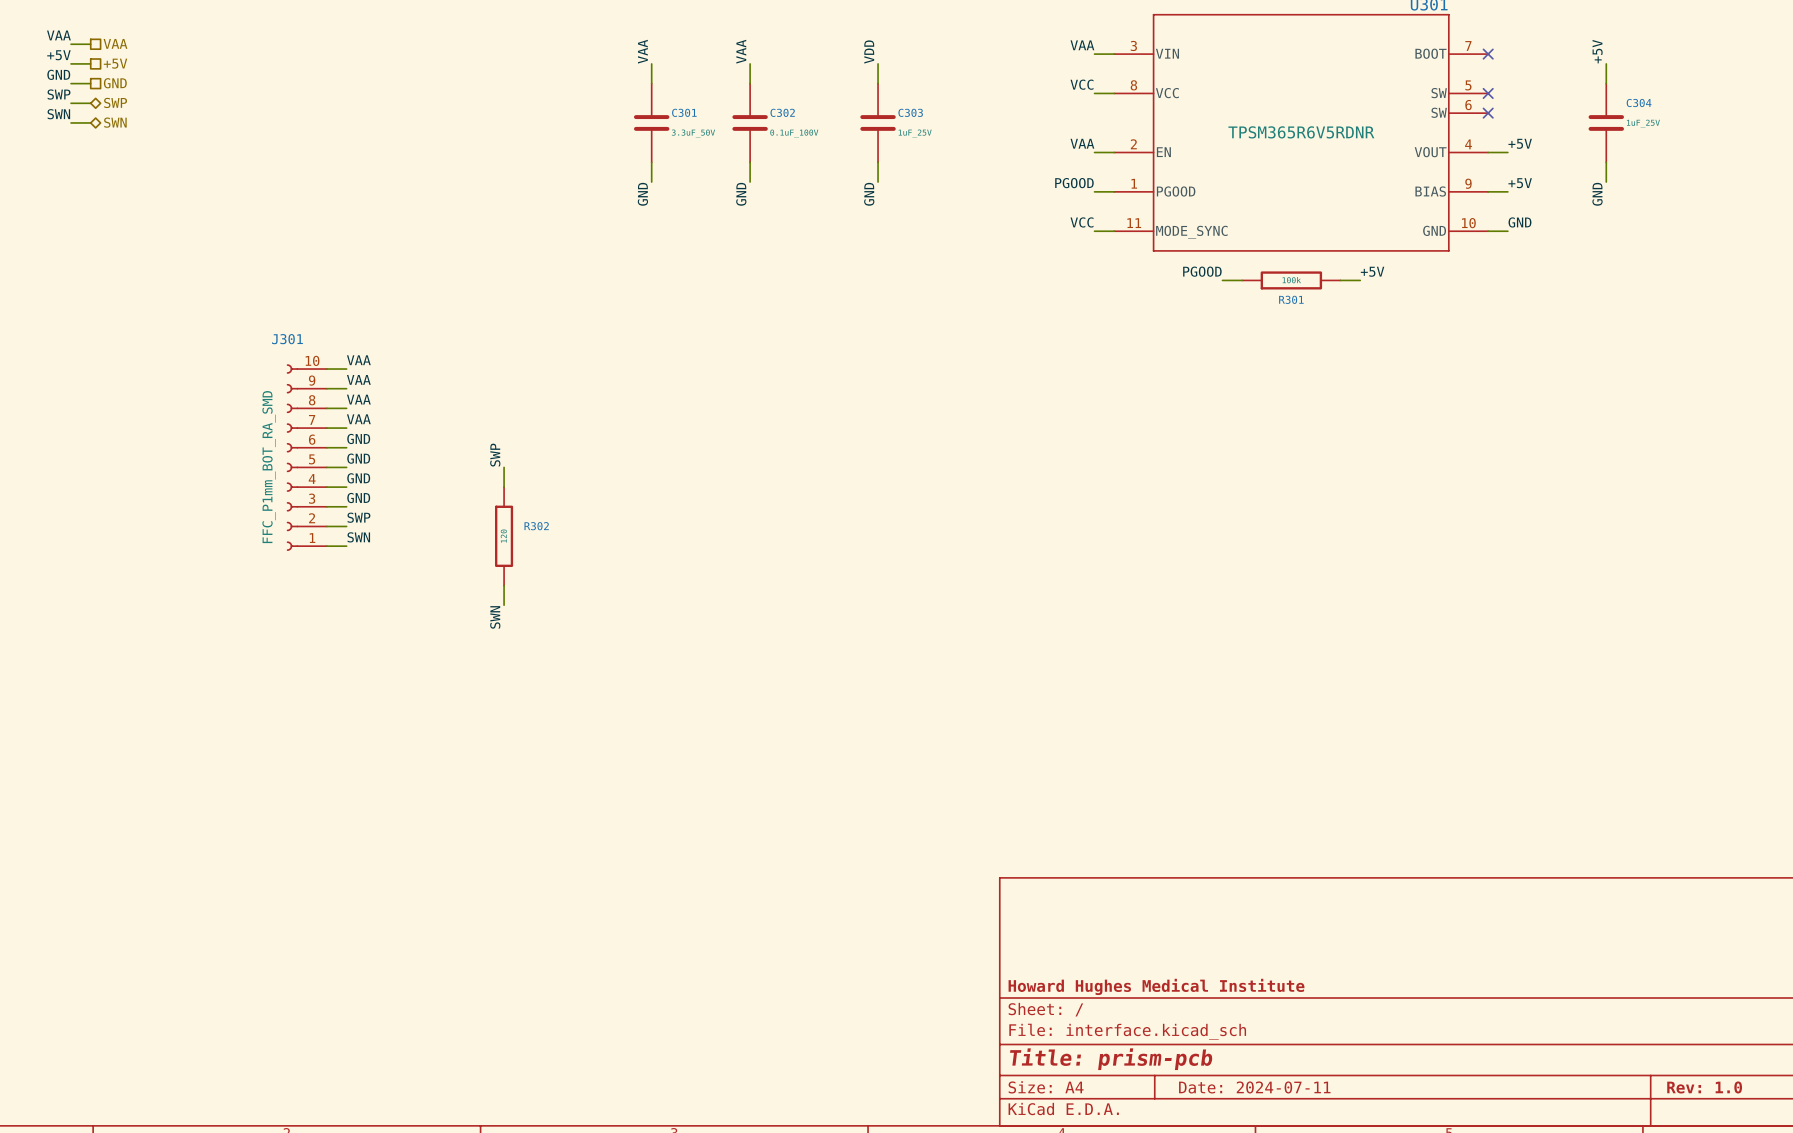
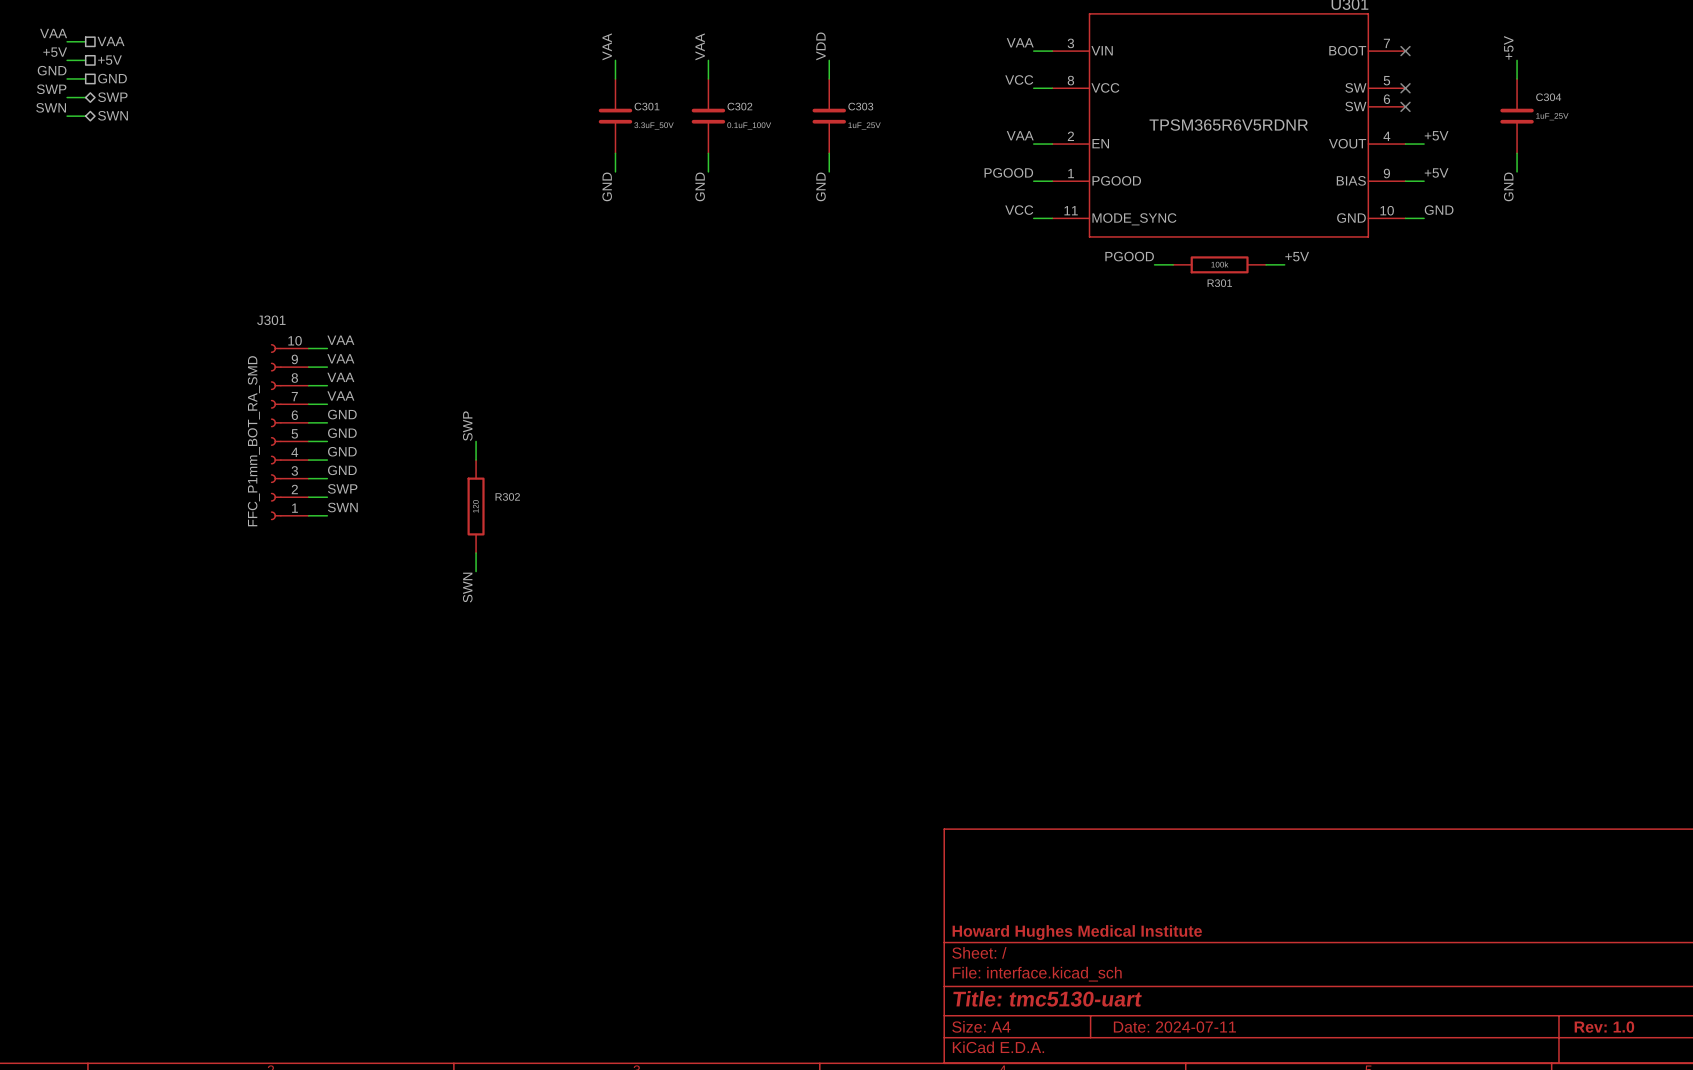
title block: Title: prism-pcb (1111, 1059) -> Title: tmc5130-uart (1047, 998)

